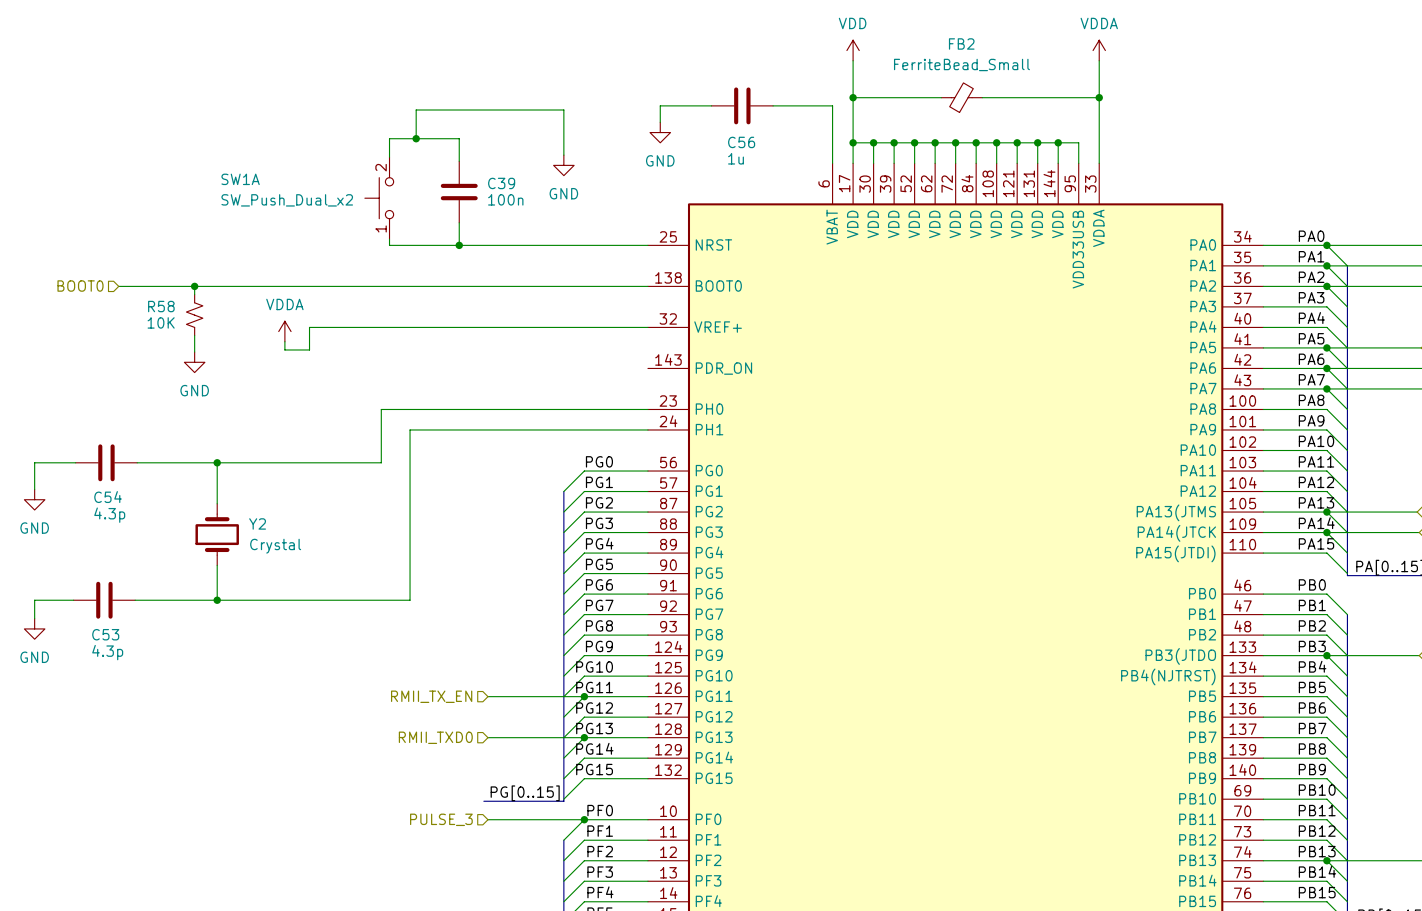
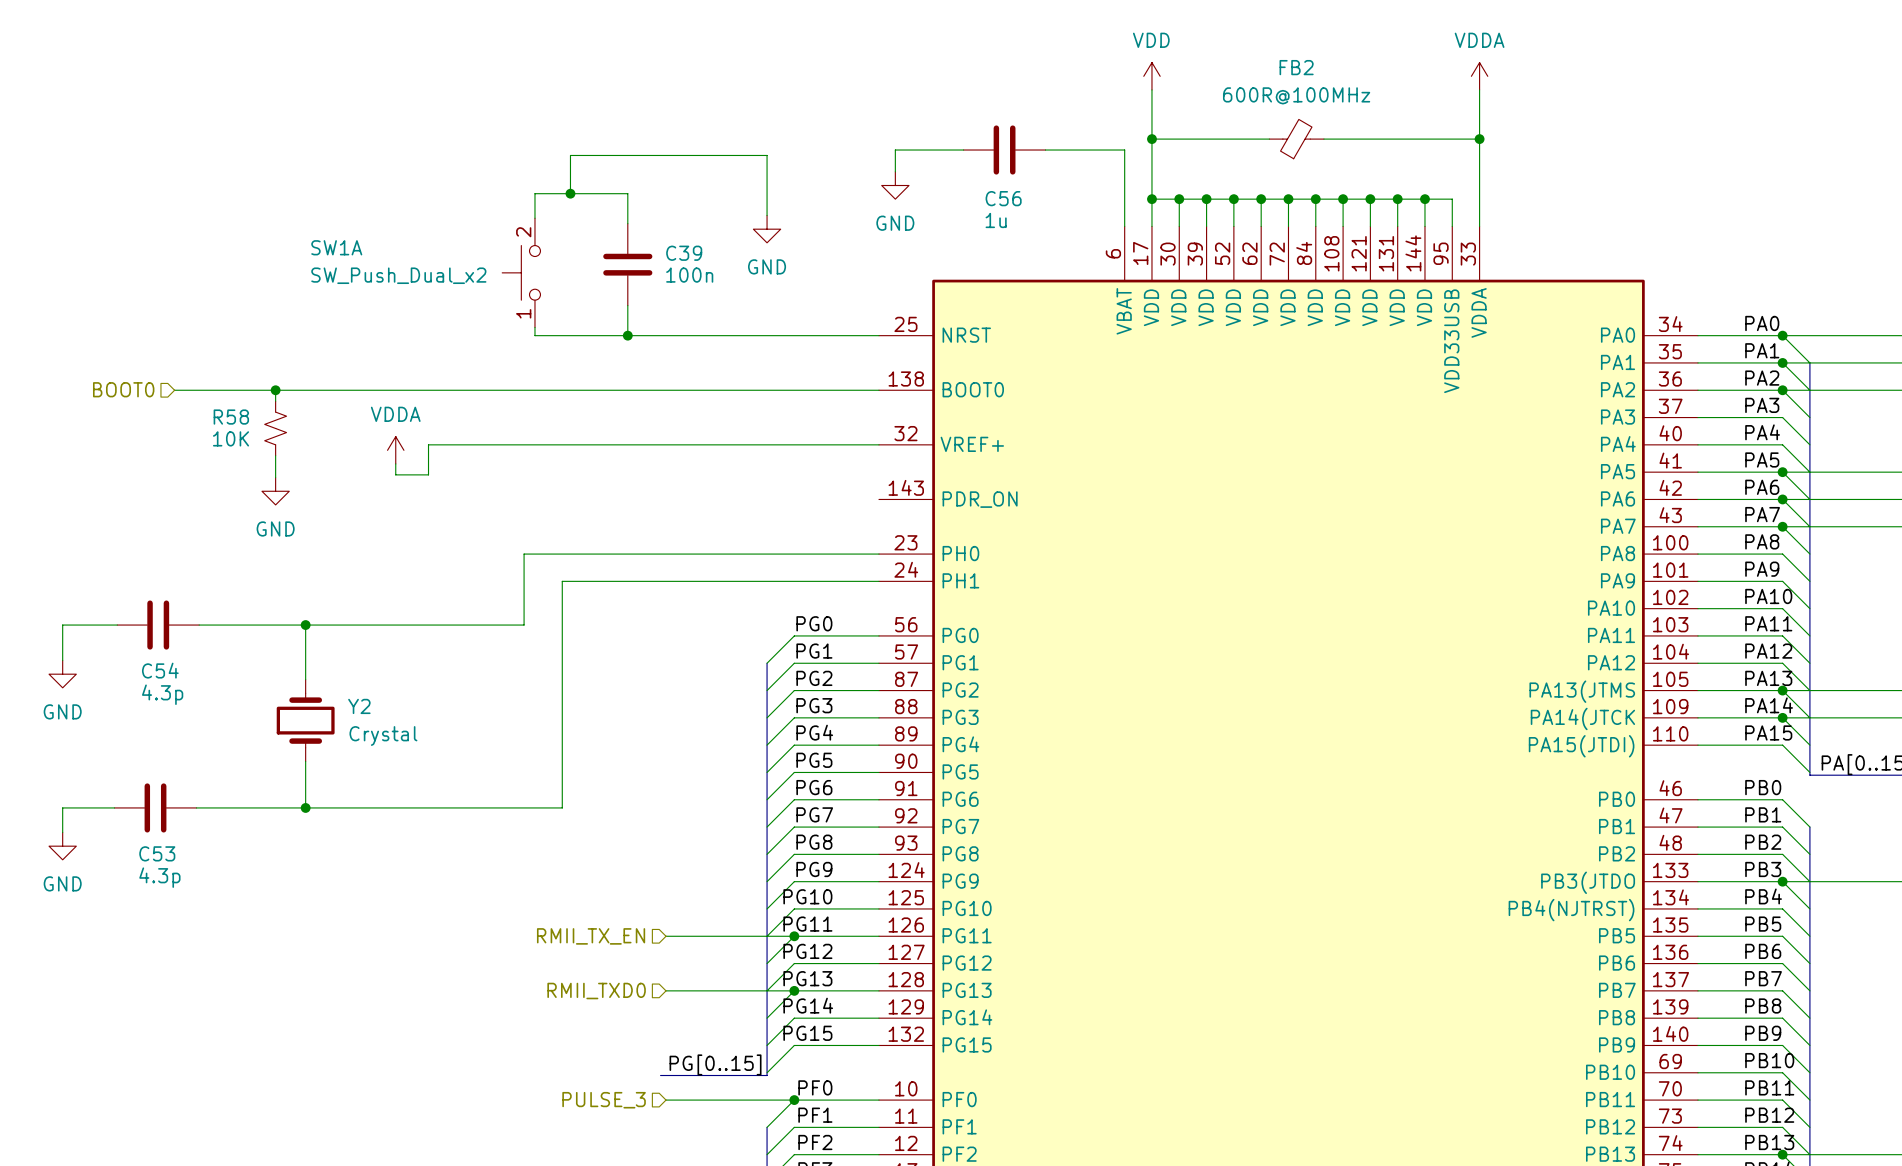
FB2 value: FerriteBead_Small (961, 64) -> 600R@100MHz (1296, 95)

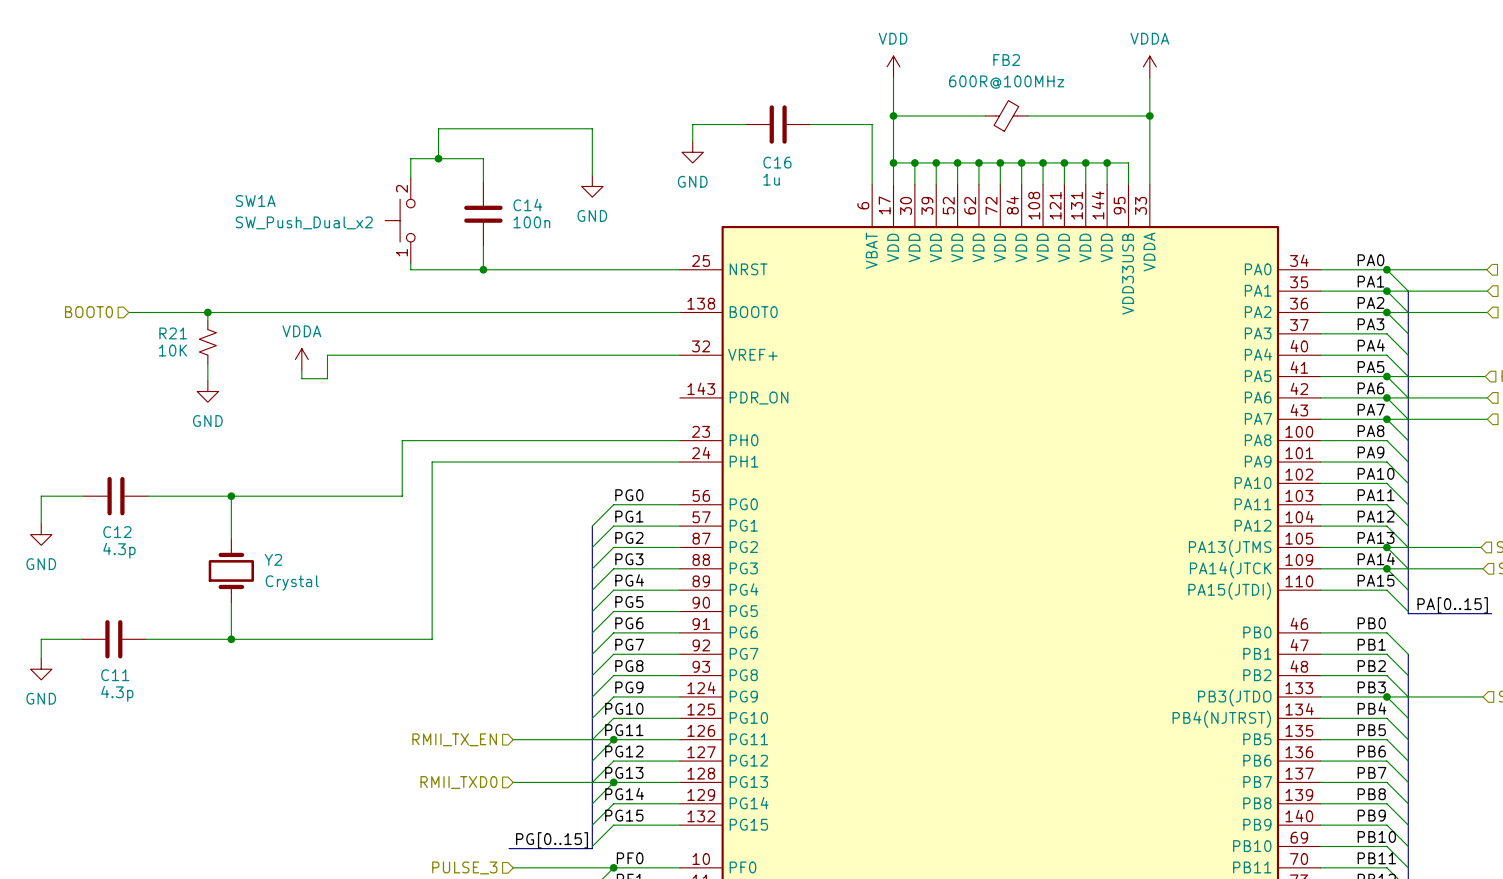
C56 name: C56 (1003, 198) -> C16 (777, 162)
C39 name: C39 (684, 253) -> C14 (527, 205)
R58 name: R58 (231, 417) -> R21 (173, 333)
C54 name: C54 (160, 670) -> C12 (117, 532)
C53 name: C53 (157, 853) -> C11 (115, 675)

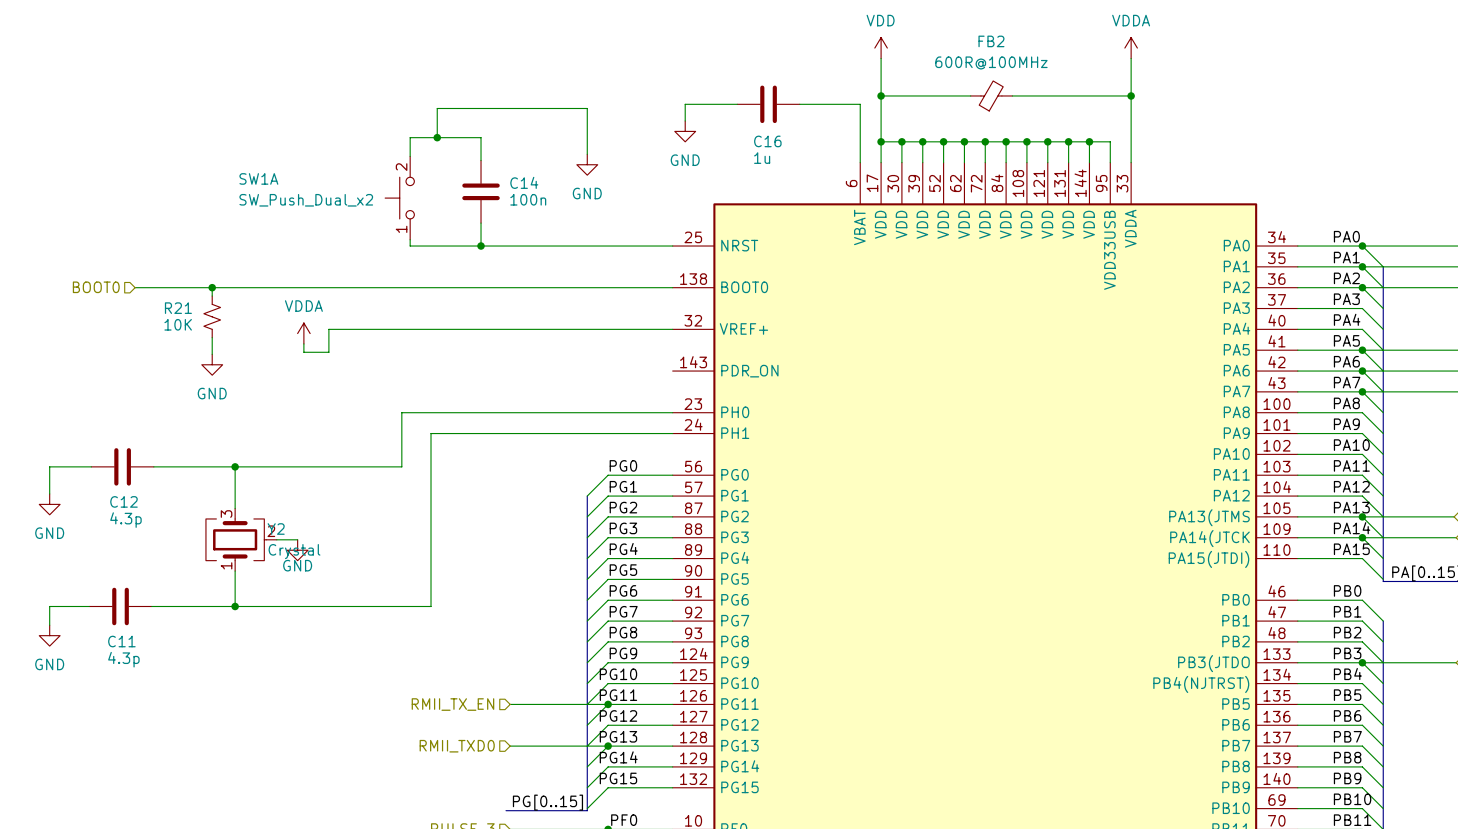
Y2 symbol: [208, 538, 254, 603] -> [205, 508, 277, 572]
wire: none -> (276, 539) (297, 539)
power symbol: none -> GND (297, 550)

